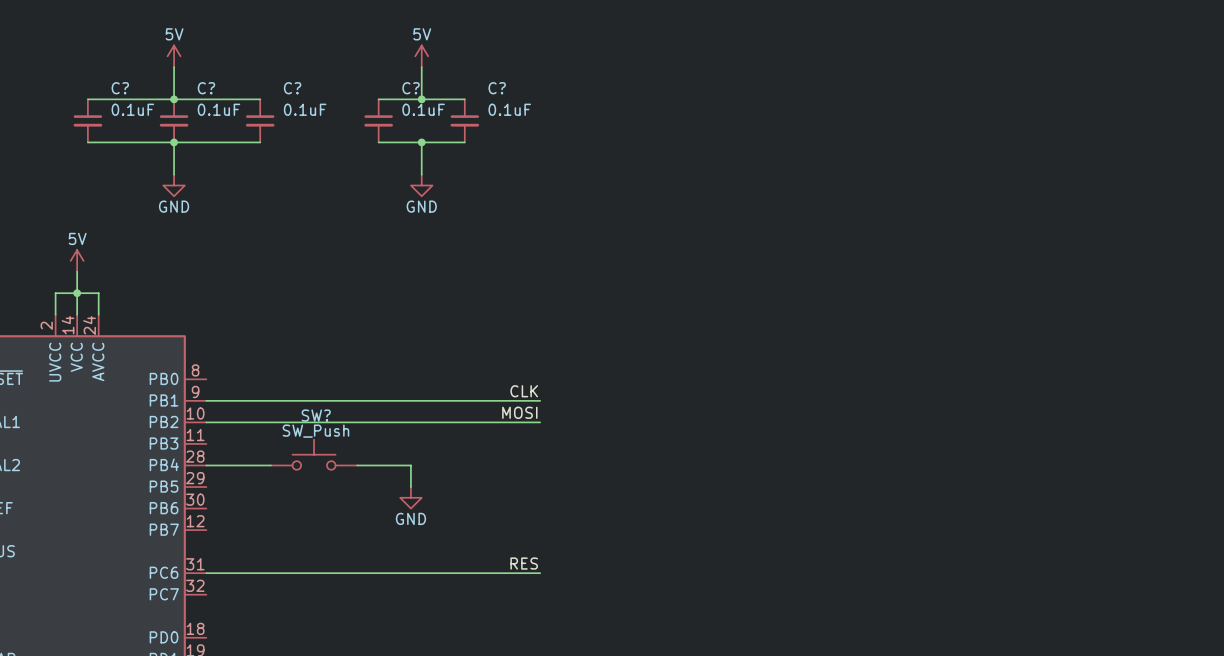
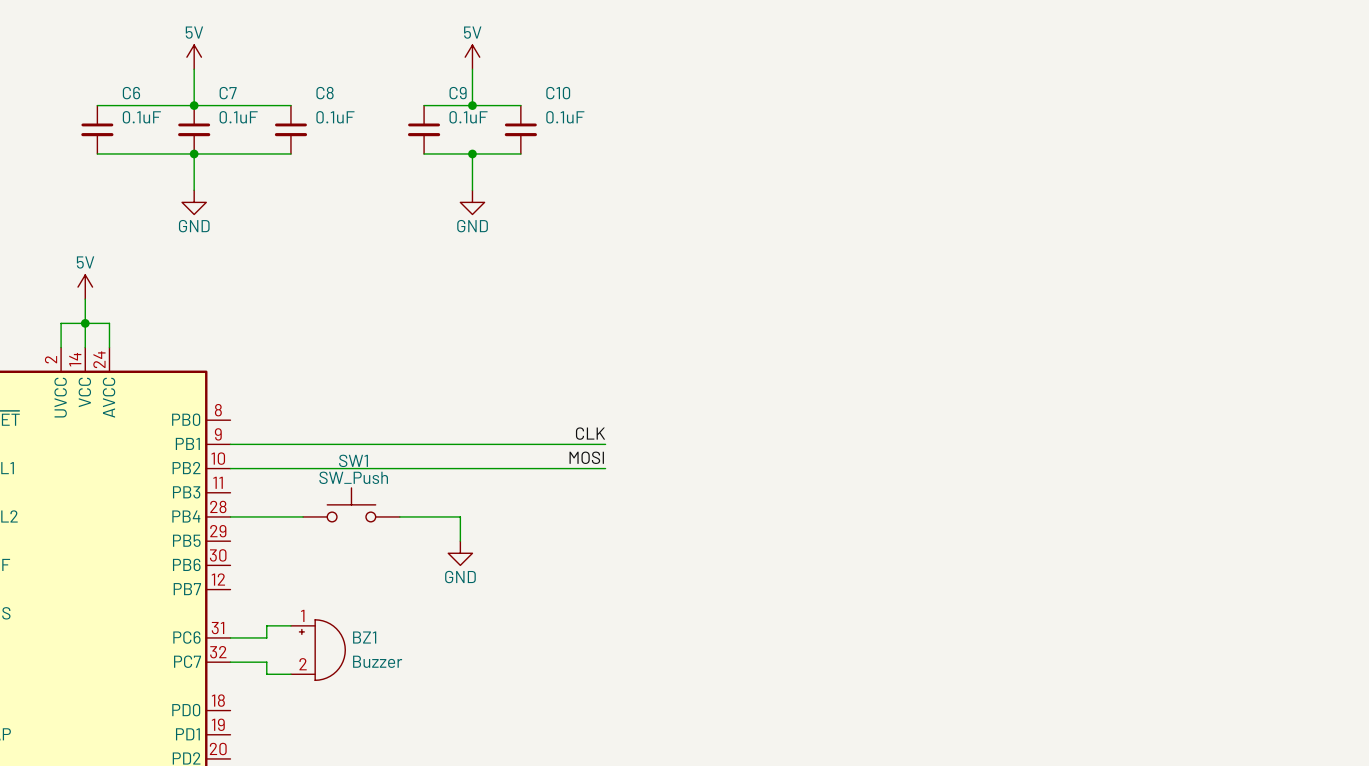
C? name: C? (120, 88) -> C6 (131, 93)
C? name: C? (206, 88) -> C7 (228, 93)
C? name: C? (292, 88) -> C8 (325, 93)
C? name: C? (411, 88) -> C9 (458, 93)
C? name: C? (497, 88) -> C10 (558, 93)
SW? name: SW? (316, 415) -> SW1 (353, 460)
label: RES (524, 563) -> none
wire: (238, 573) (540, 573) -> (266, 637) (266, 625) (290, 625)
BZ1: none -> Buzzer (318, 650)
wire: none -> (230, 662) (266, 662) (266, 674) (290, 674)

